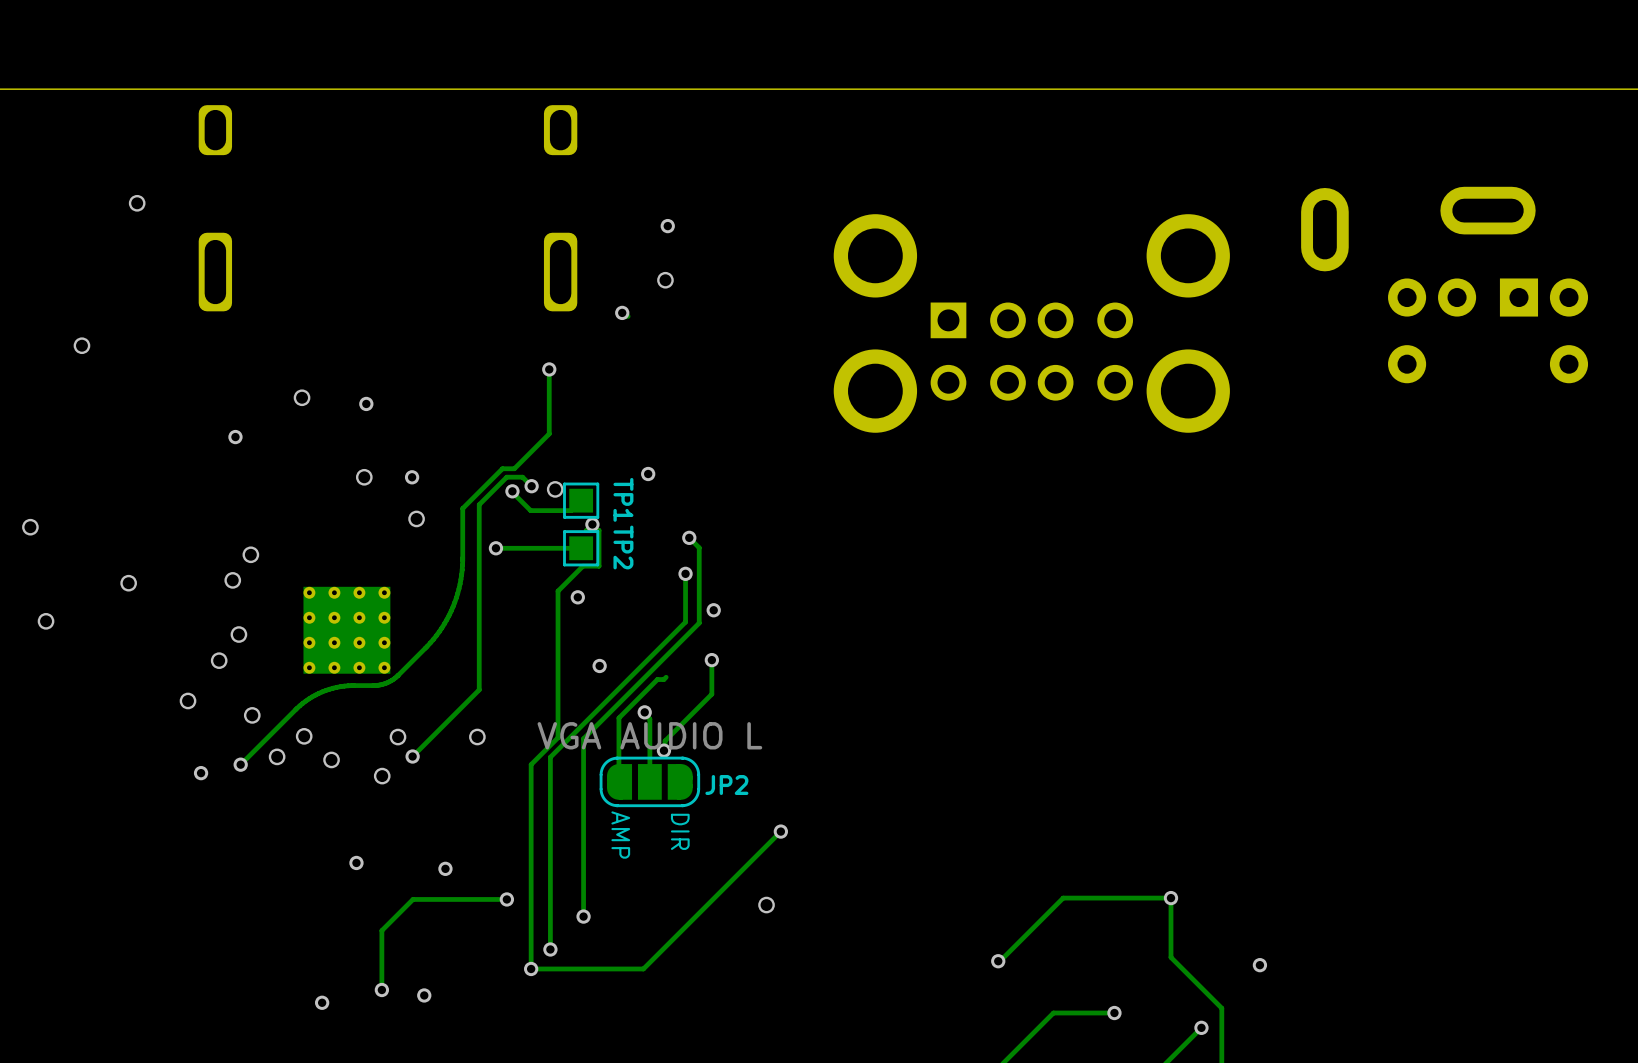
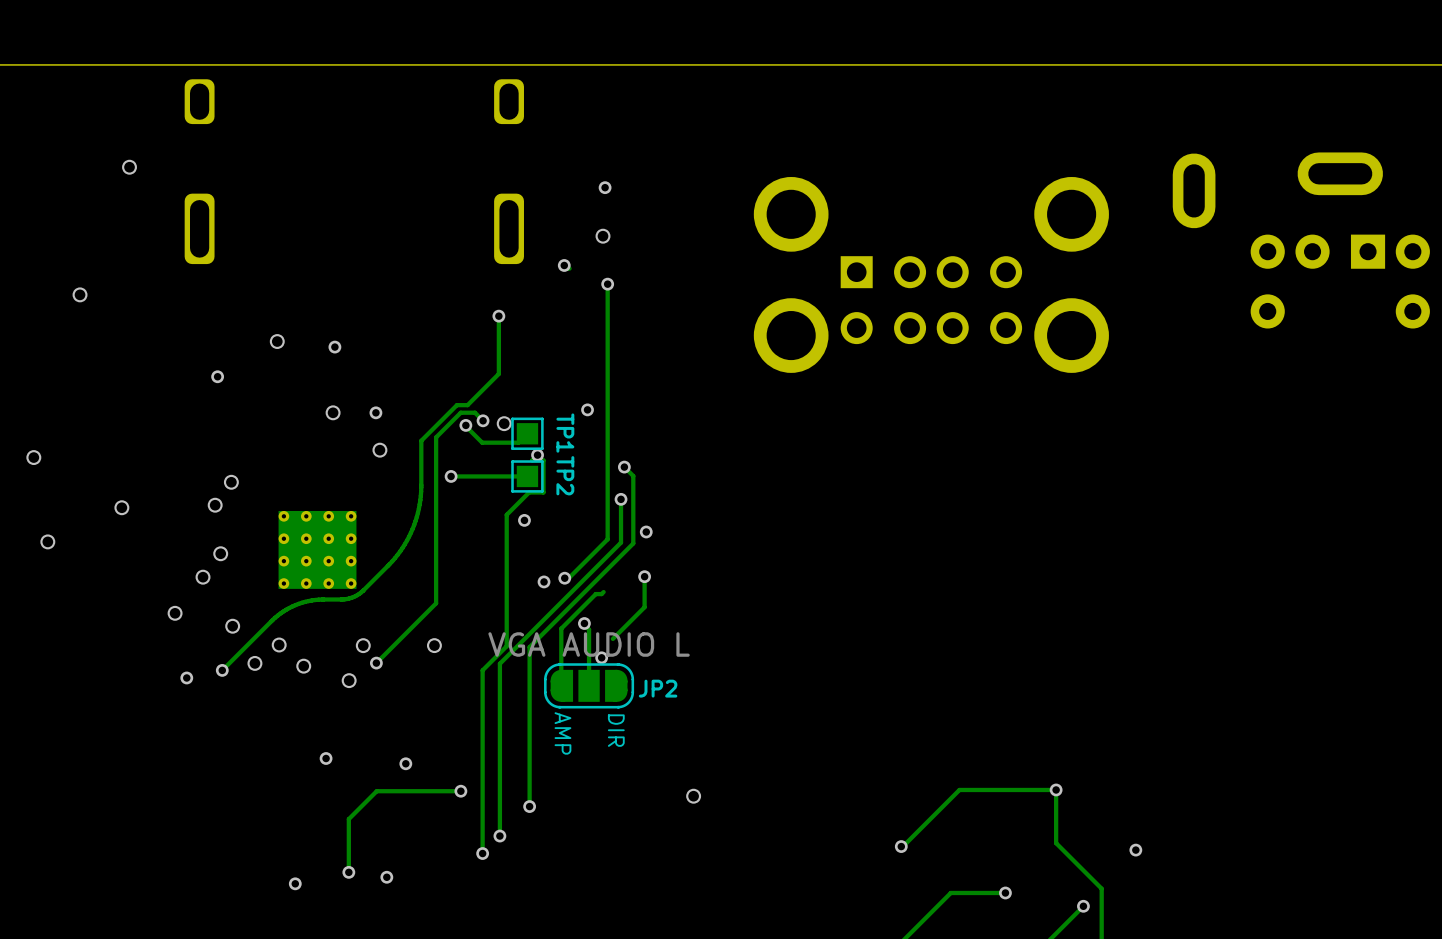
track: none -> (607, 284) (607, 539) (568, 578) (564, 578)
via: none -> (607, 284)
via: none -> (564, 578)
track: (676, 729) (665, 740) (663, 750) -> none
track: (780, 831) (643, 968) (531, 968) -> none
via: (780, 831) -> none

